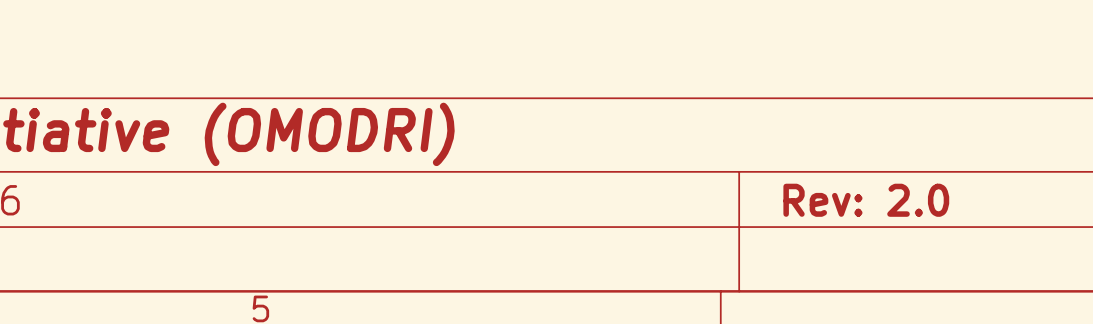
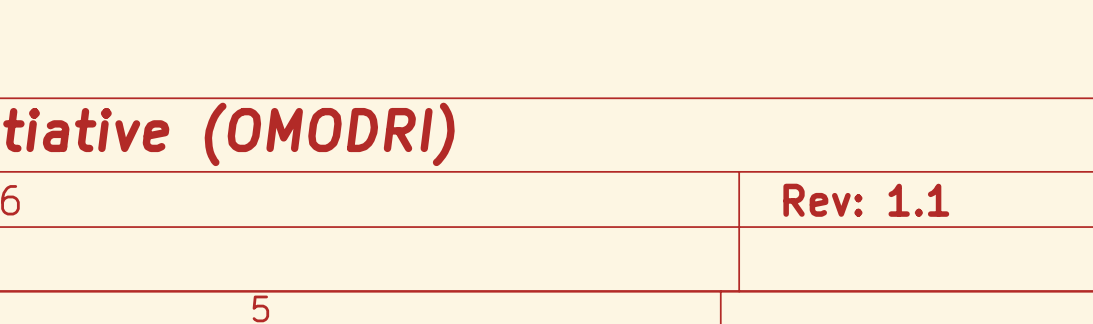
title block: Rev: 2.0 (866, 200) -> Rev: 1.1 (866, 200)

